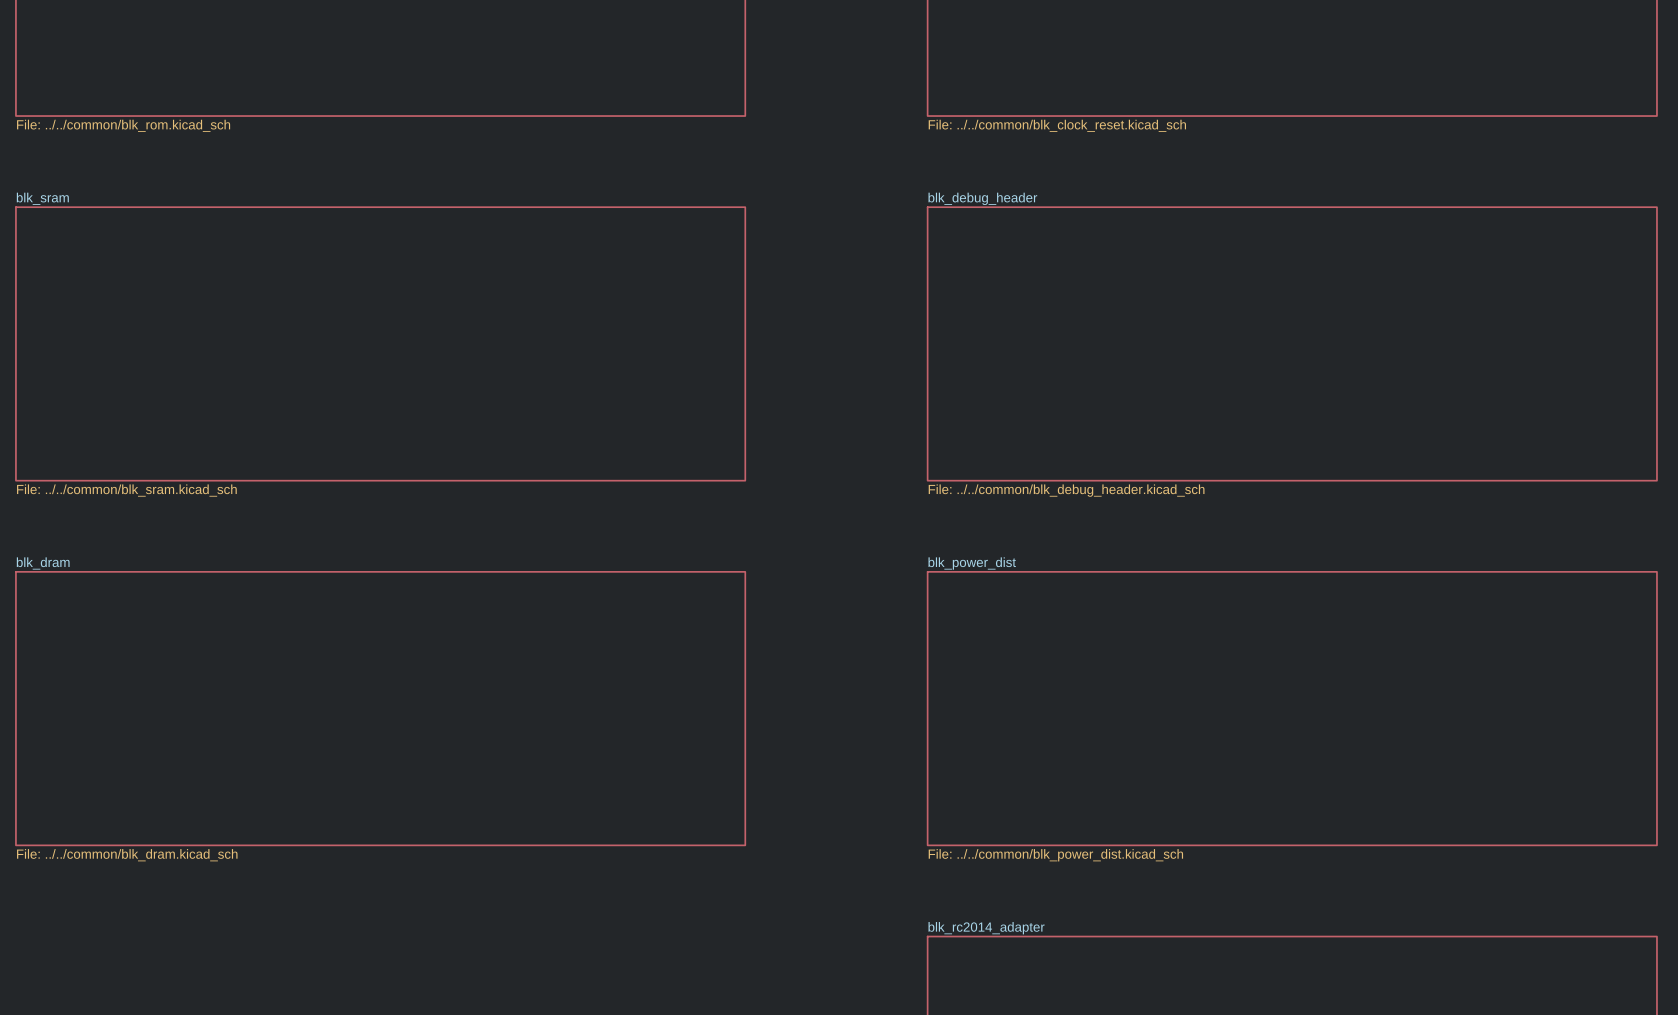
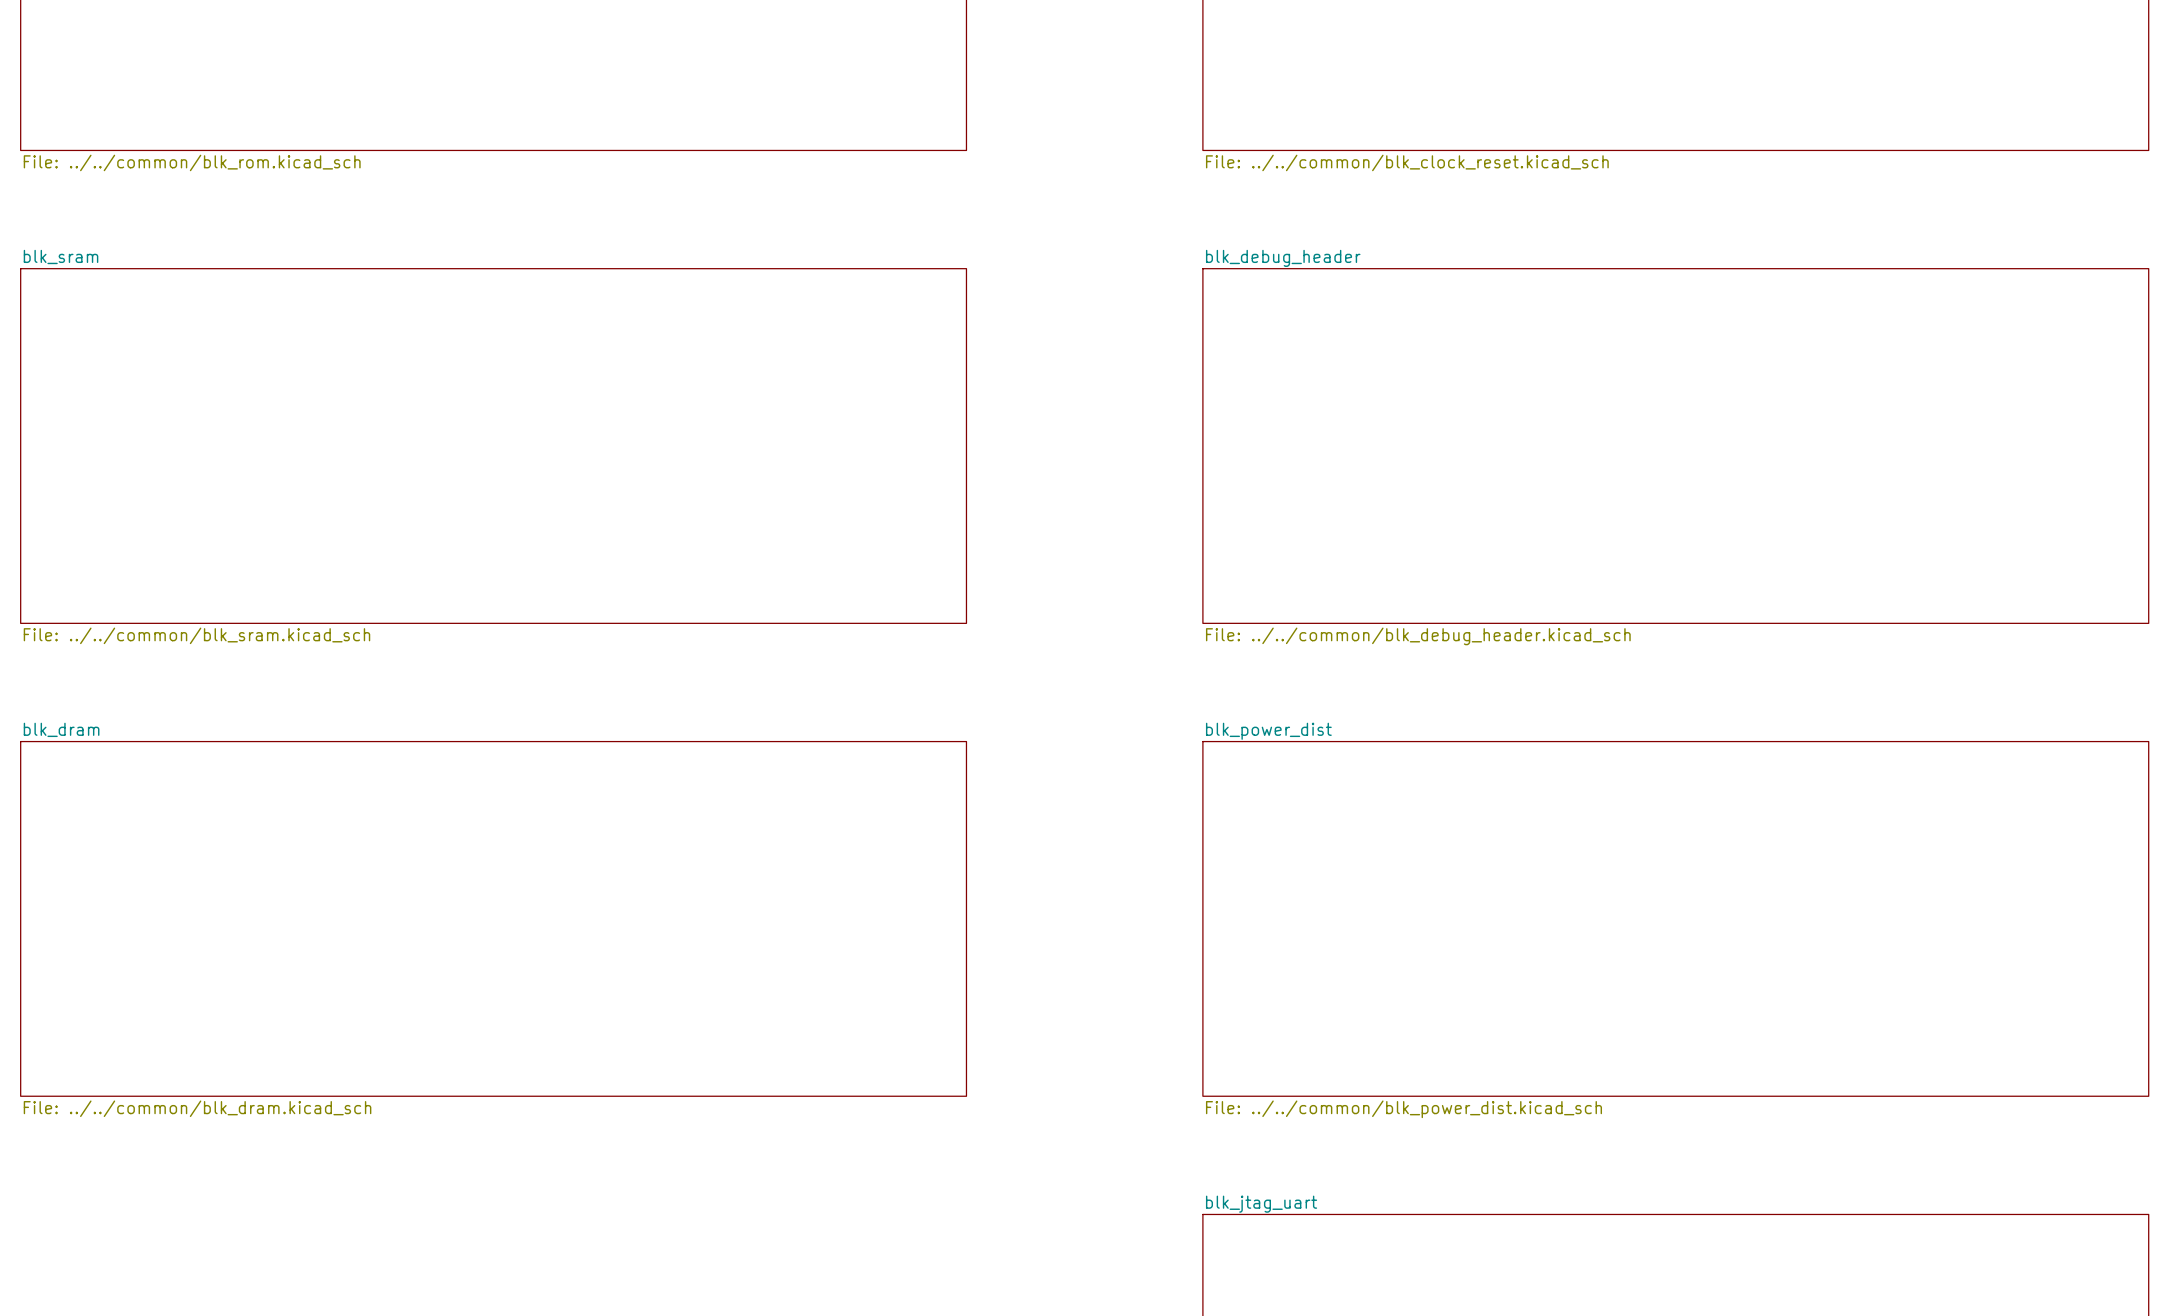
sheet blk_rc2014_adapter name: blk_rc2014_adapter (986, 928) -> blk_jtag_uart (1261, 1204)

